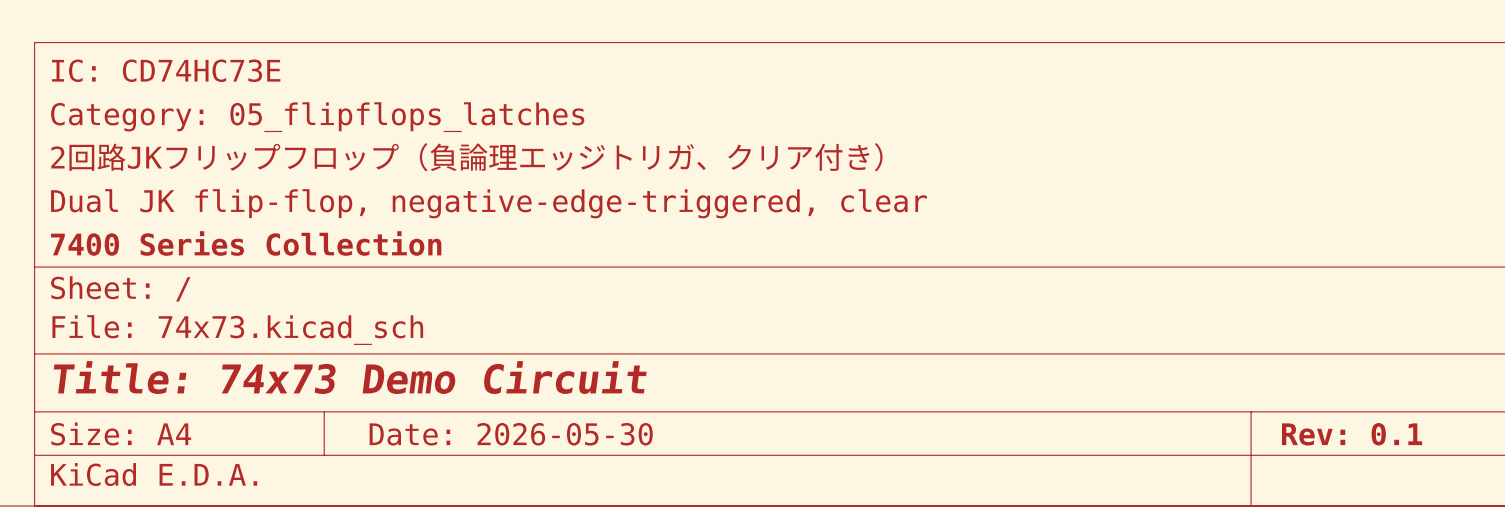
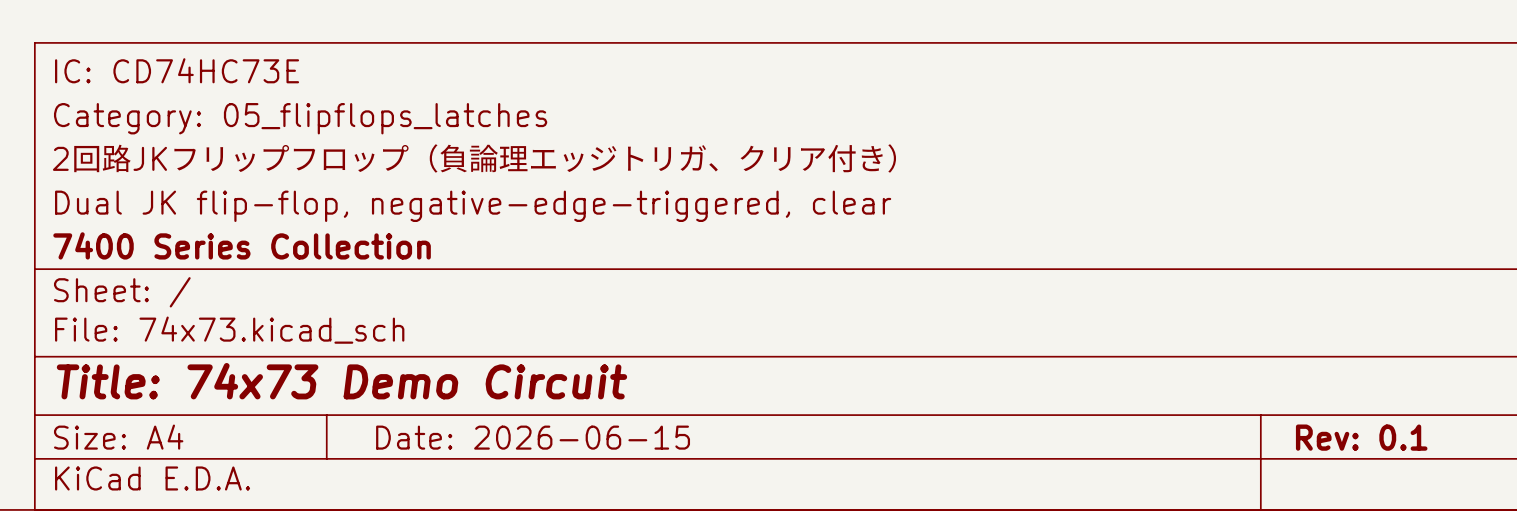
title block: Date: 2026-05-30 (511, 434) -> Date: 2026-06-15 (533, 437)

